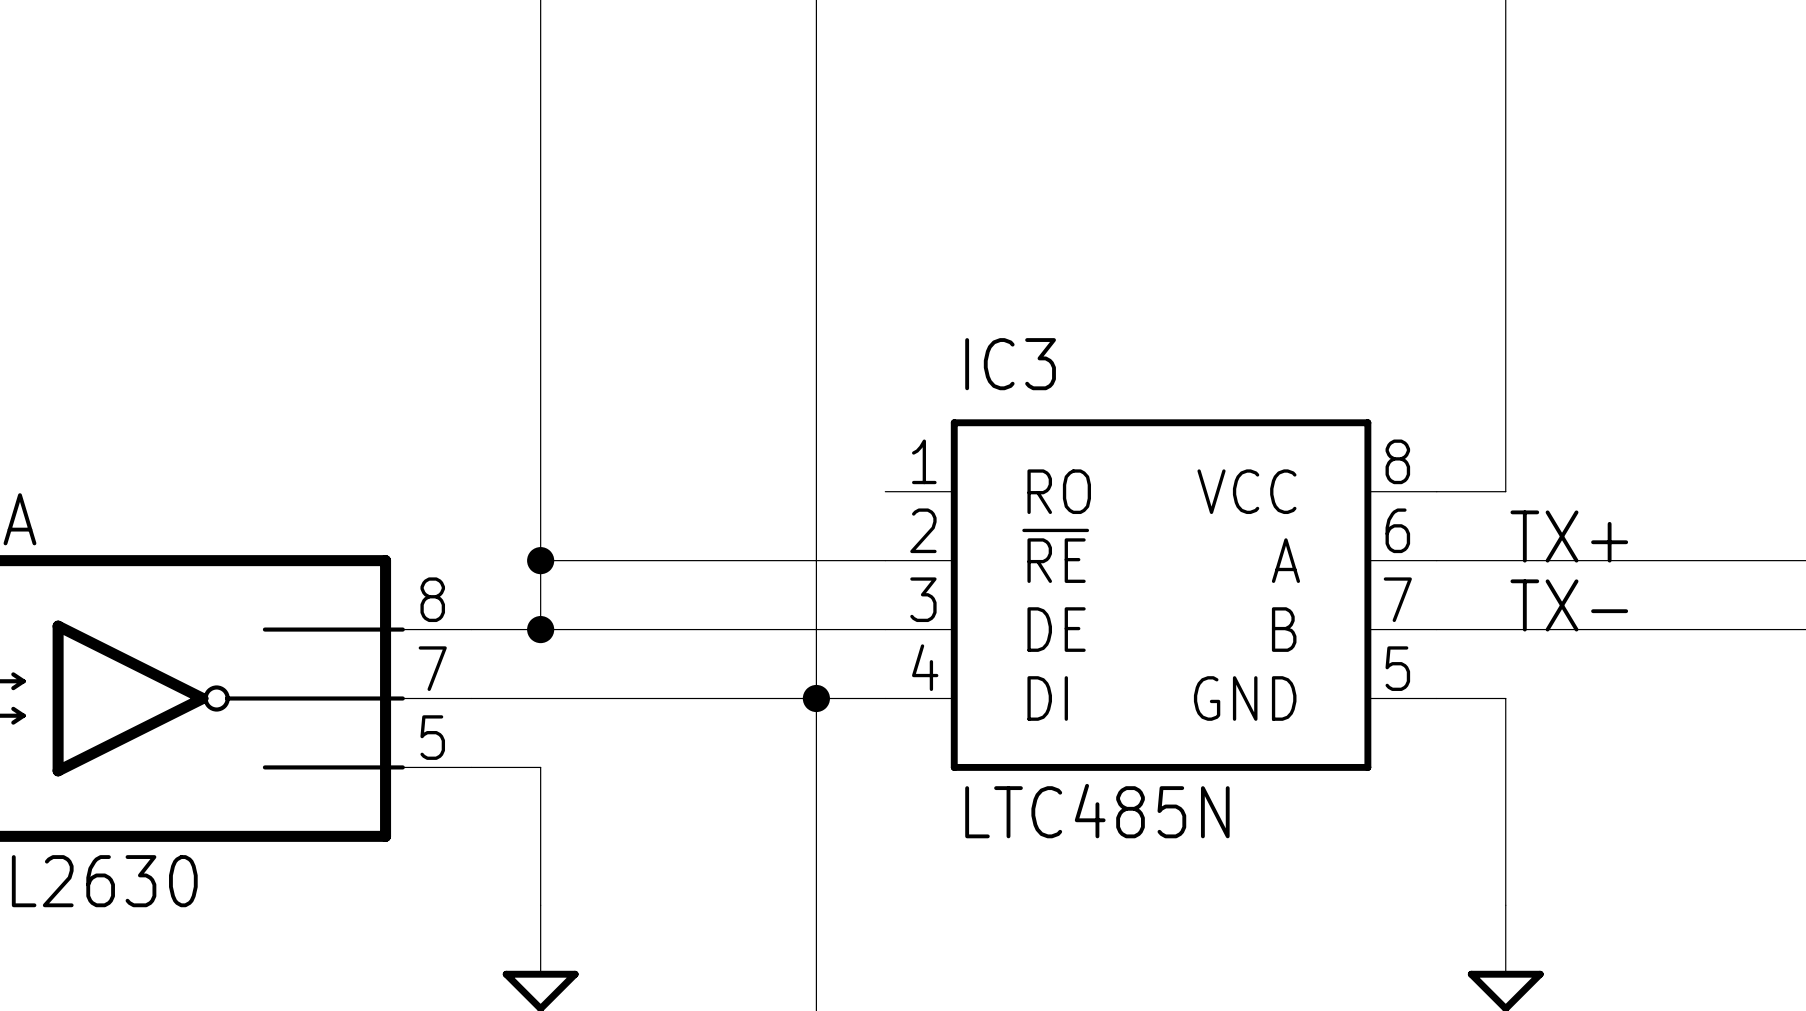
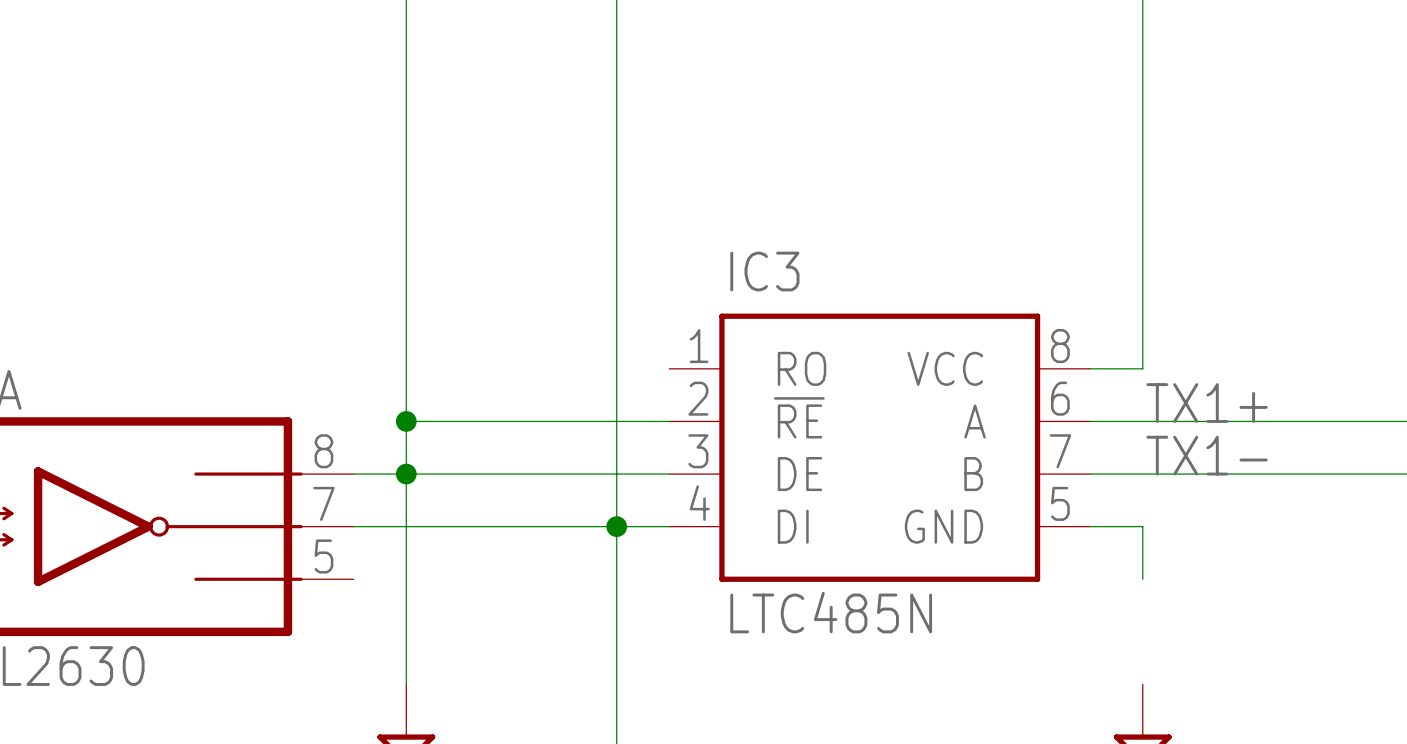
label: TX+ (1569, 536) -> TX1+ (1207, 403)
label: TX- (1569, 605) -> TX1- (1207, 455)
wire: (471, 767) (540, 767) -> (406, 474) (406, 579)
wire: (1505, 767) (1505, 905) -> none

